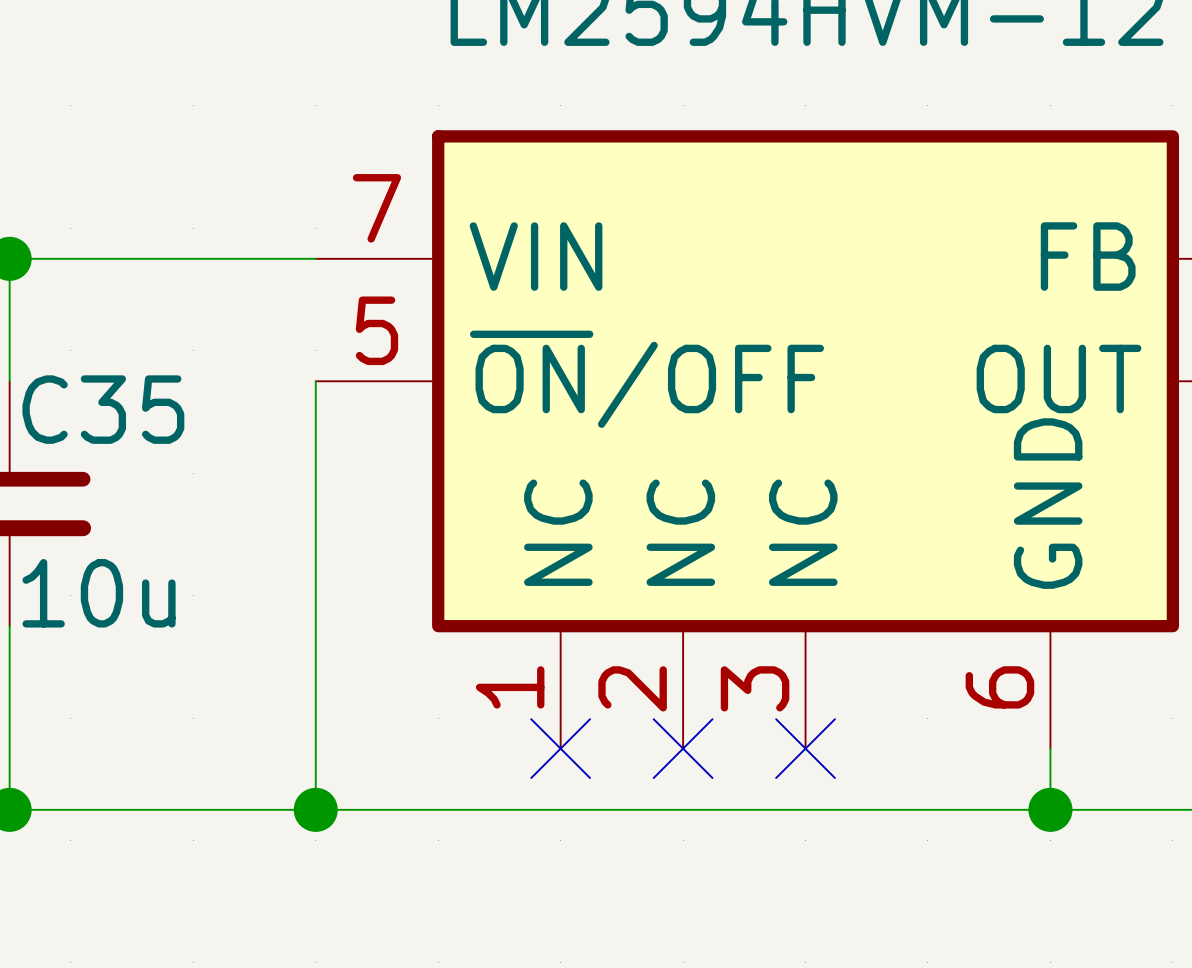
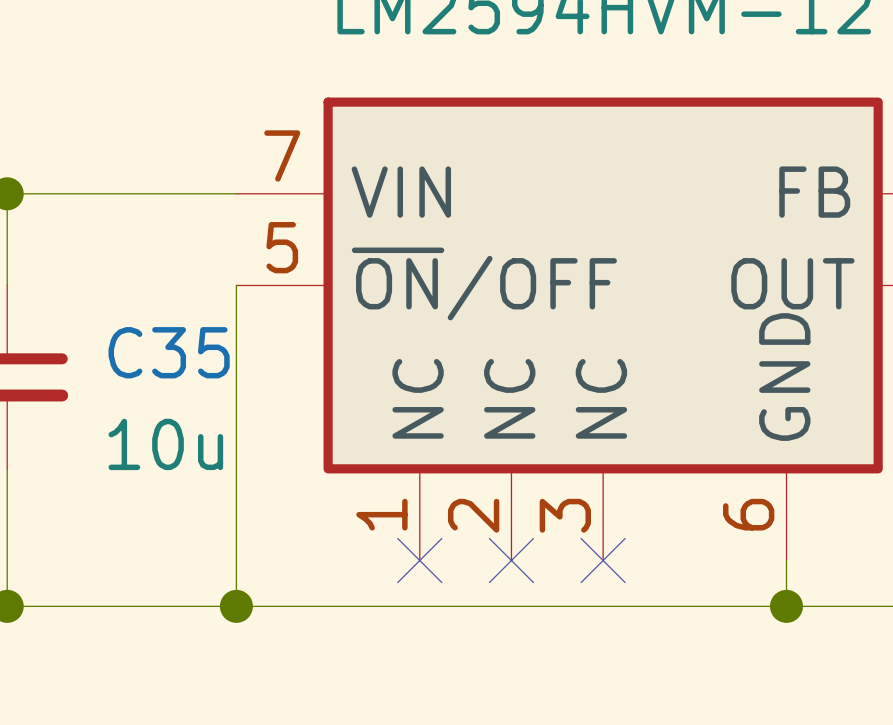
C35 name position: C35 (103, 409) -> C35 (169, 352)
C35 value position: 10u (99, 593) -> 10u (165, 444)

